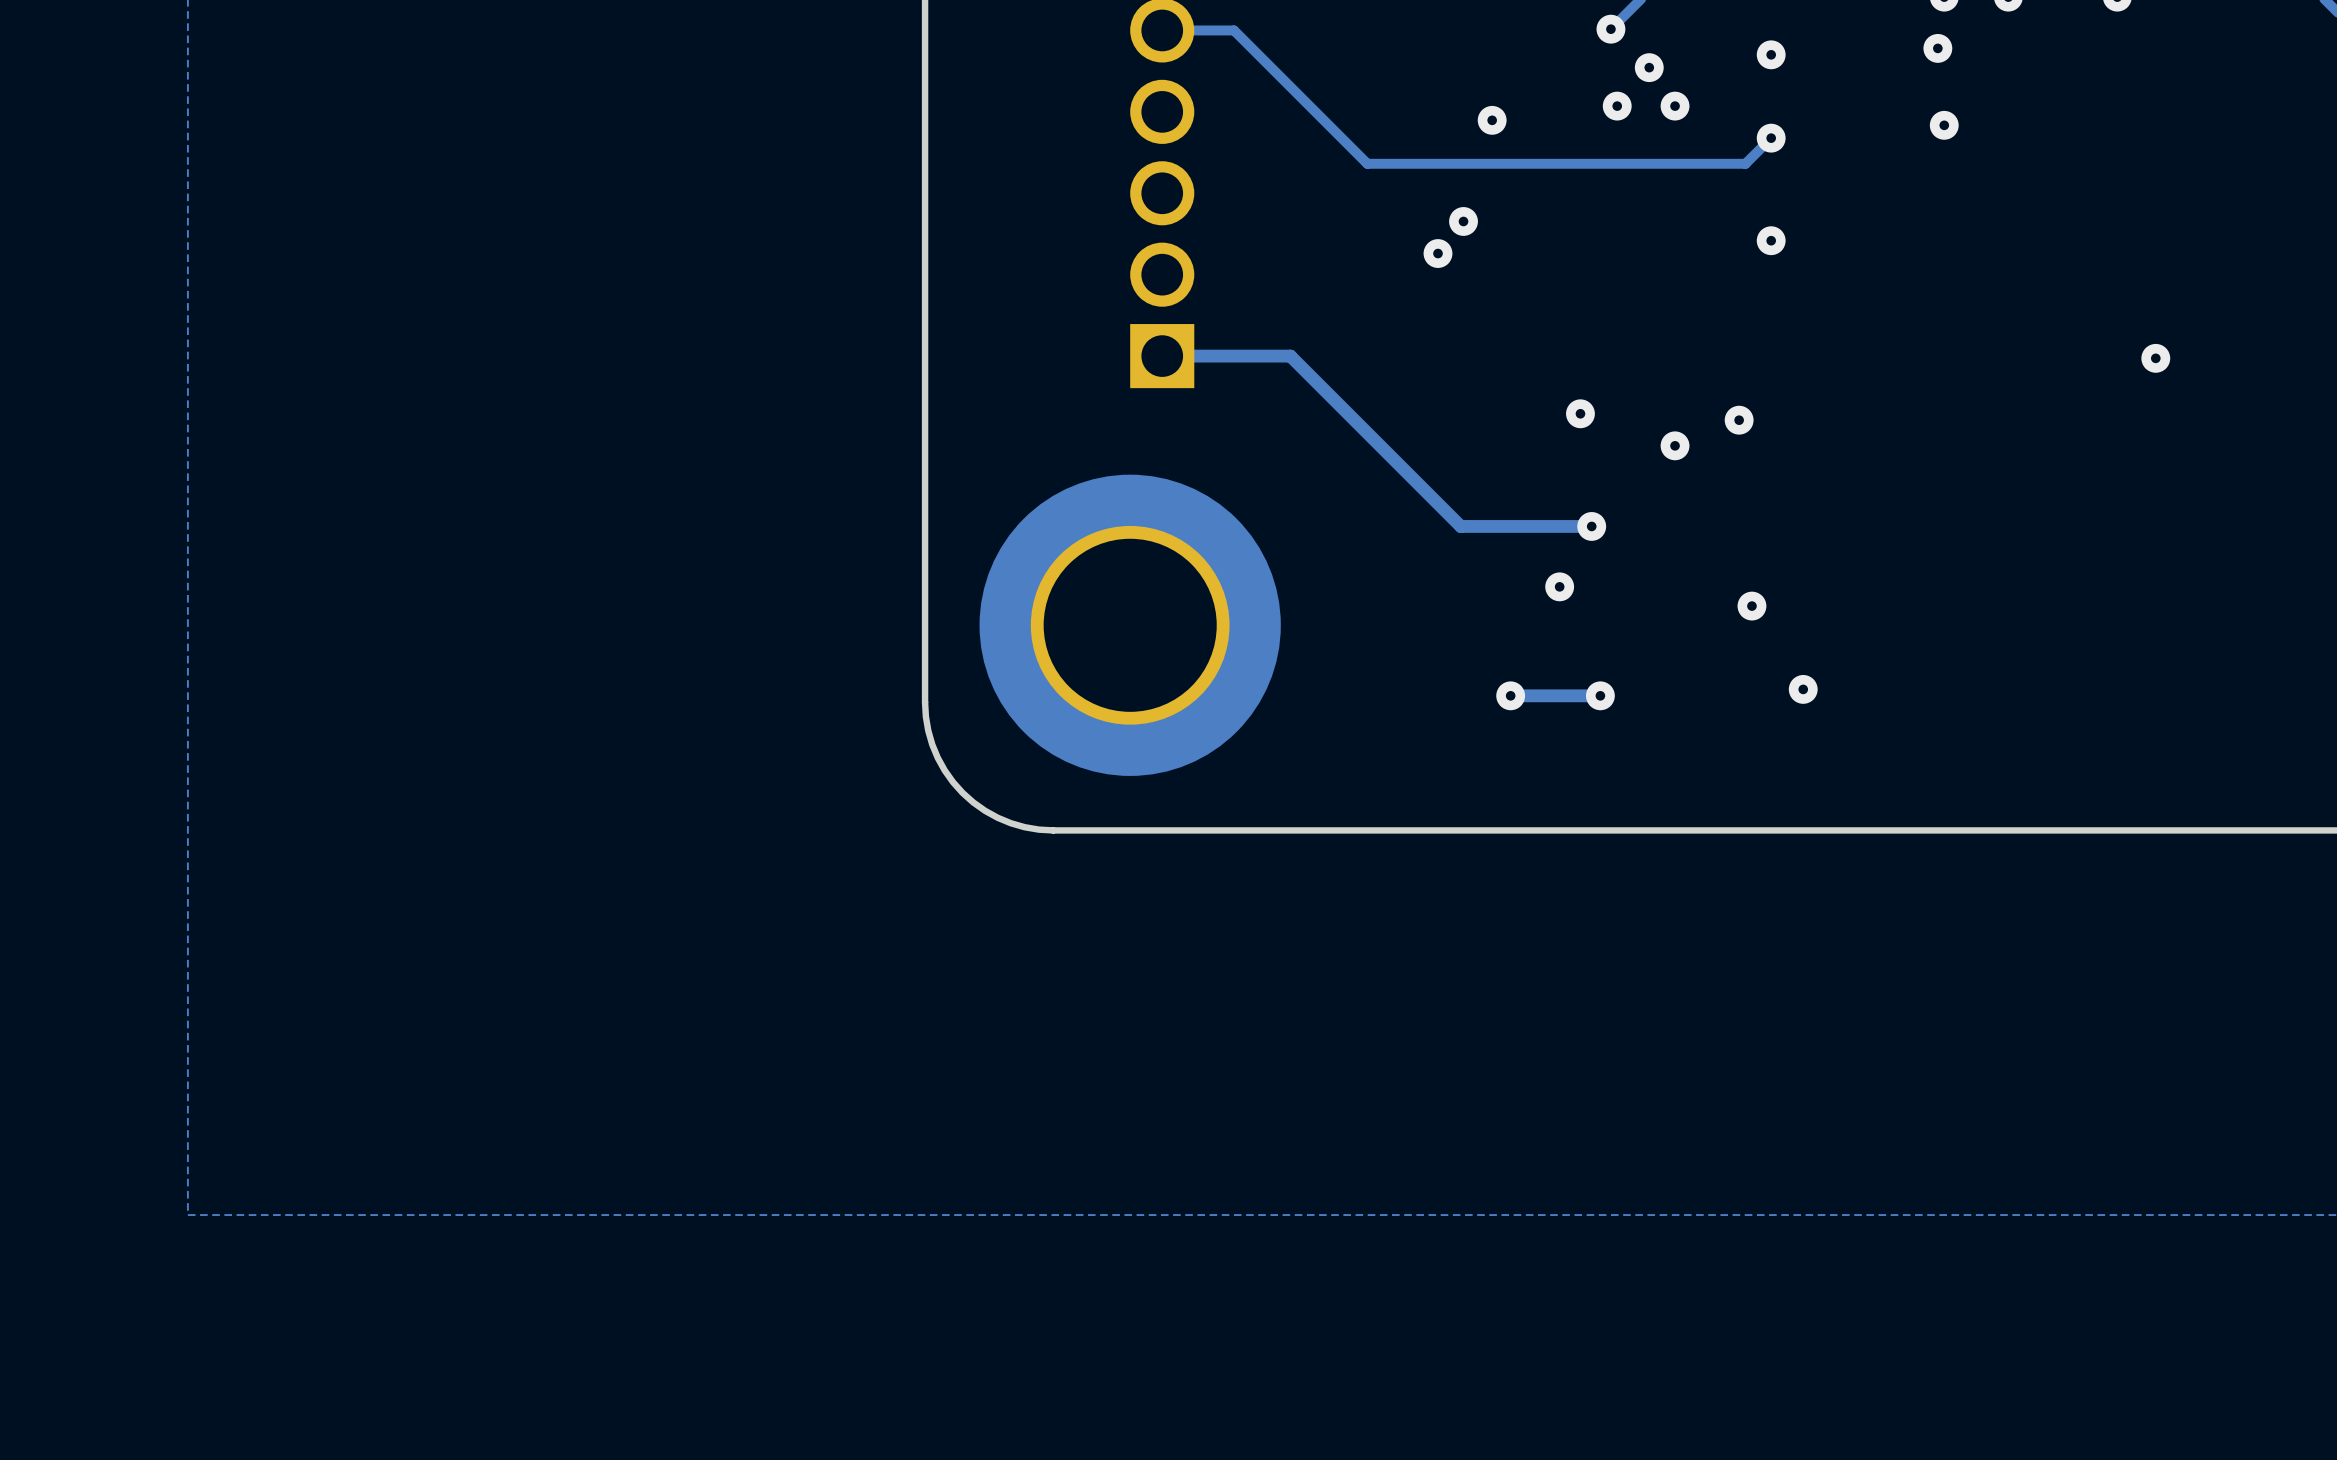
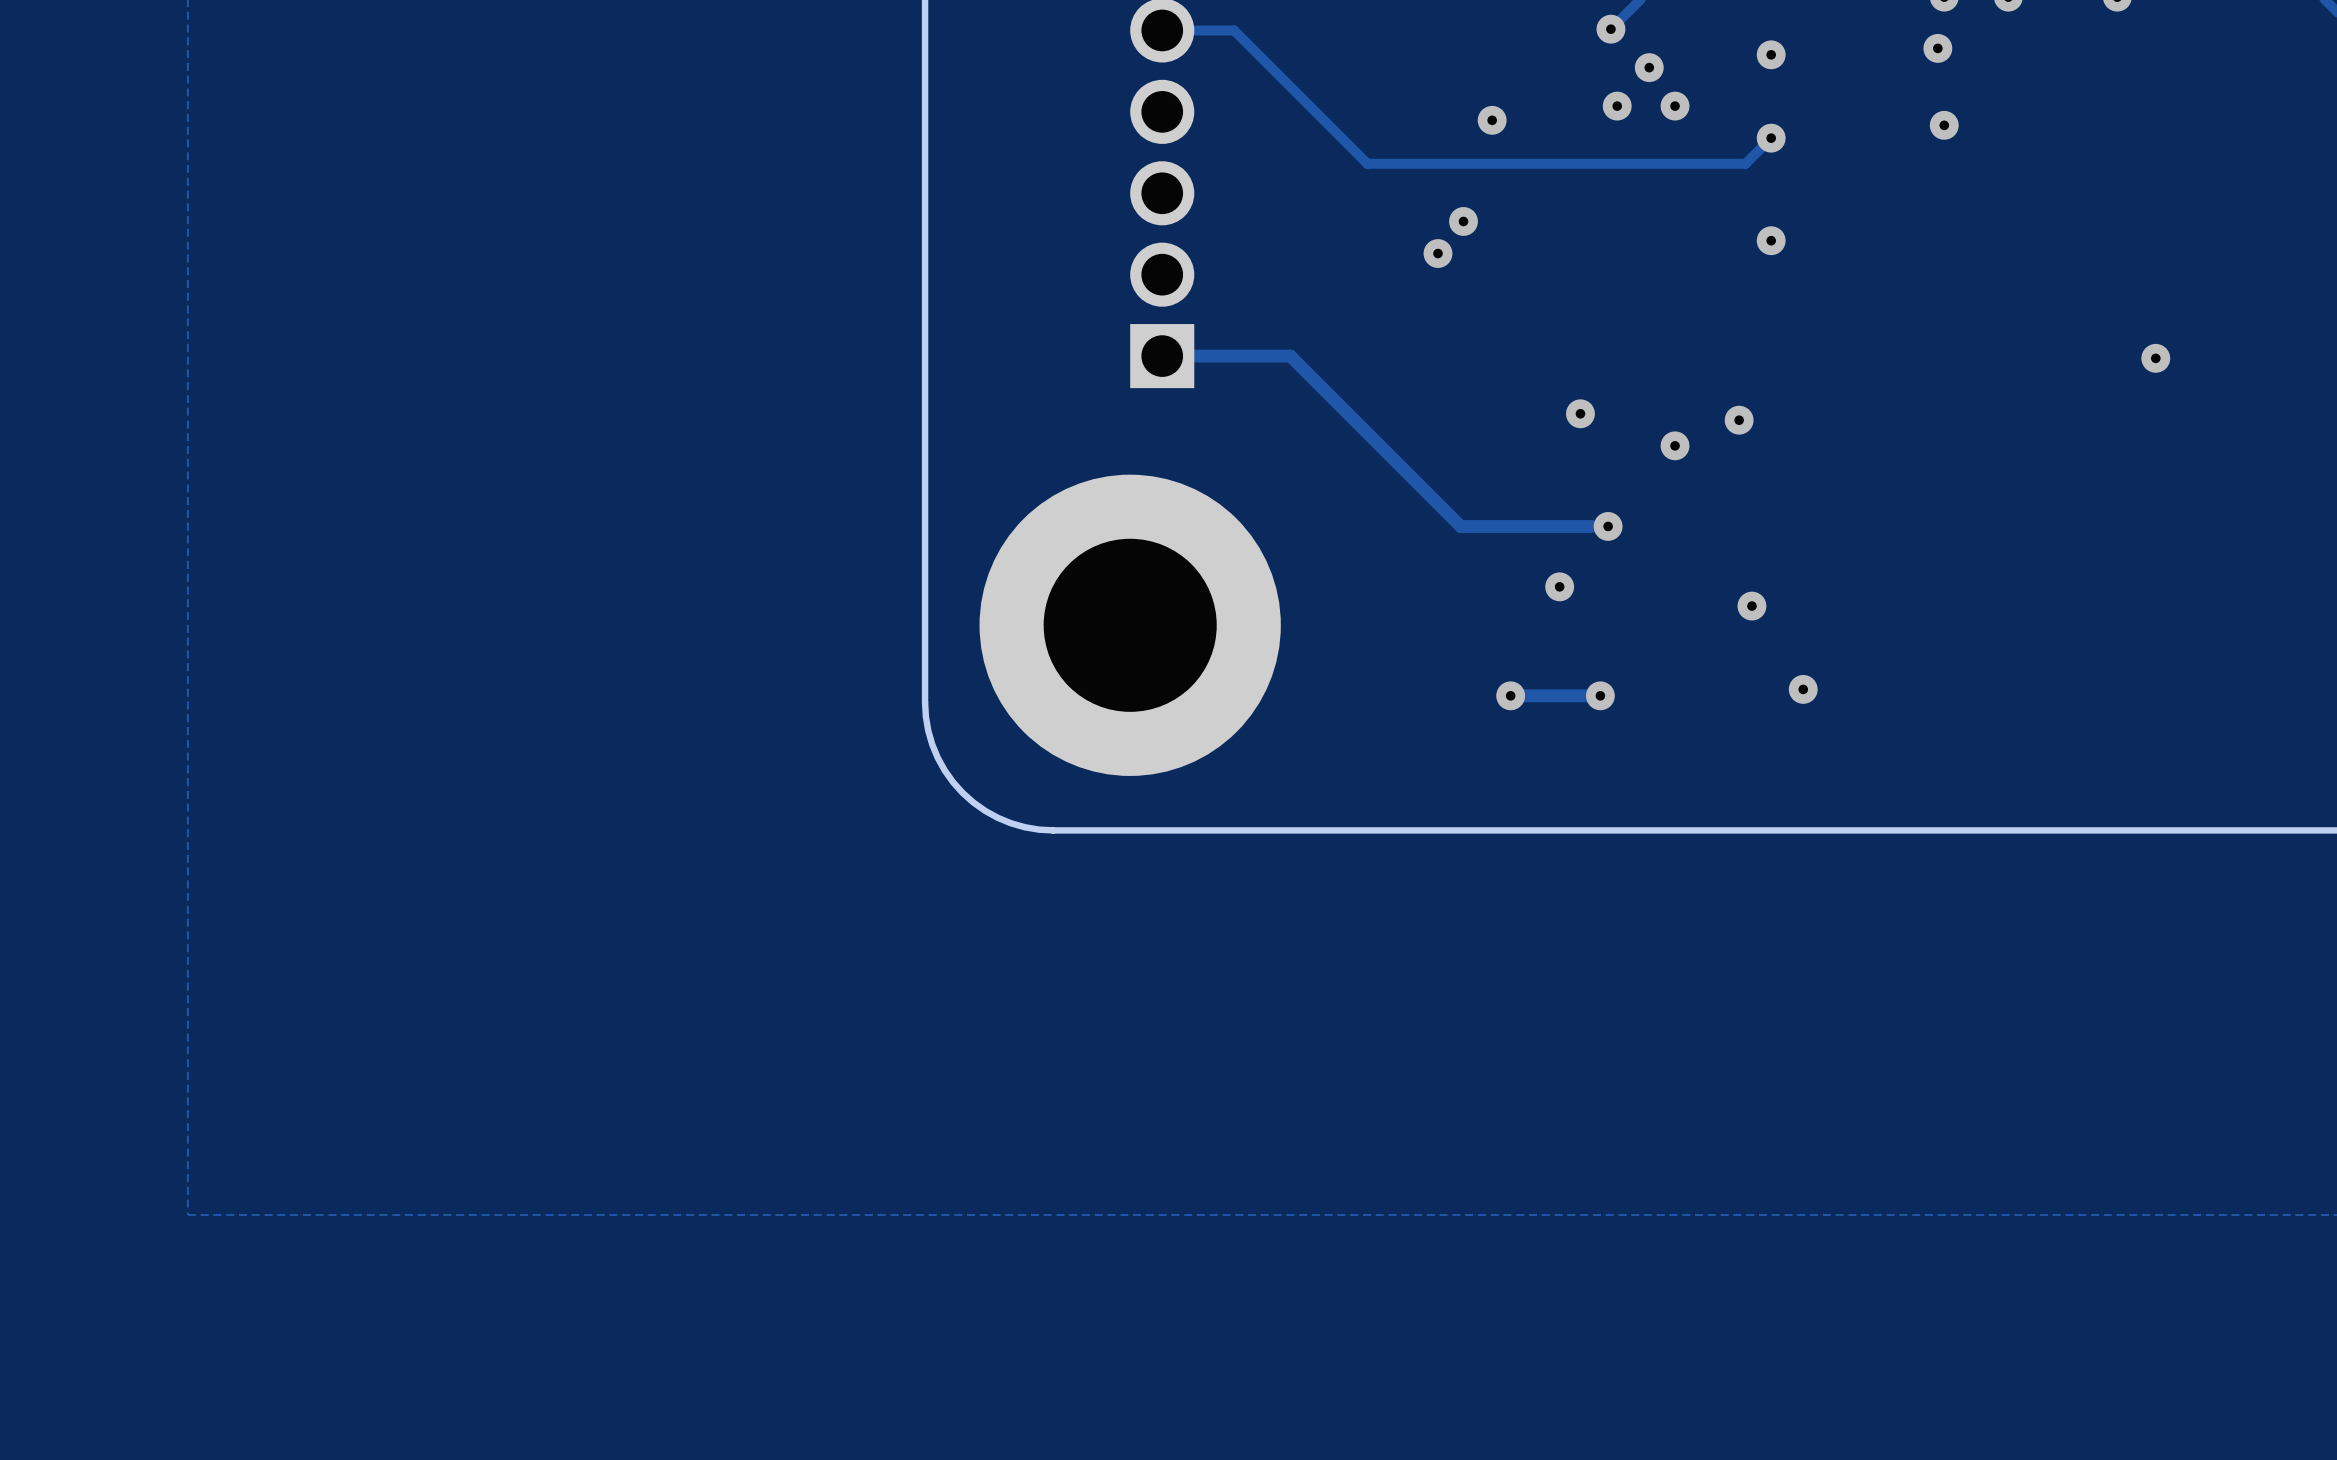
via position: (1591, 526) -> (1608, 526)

